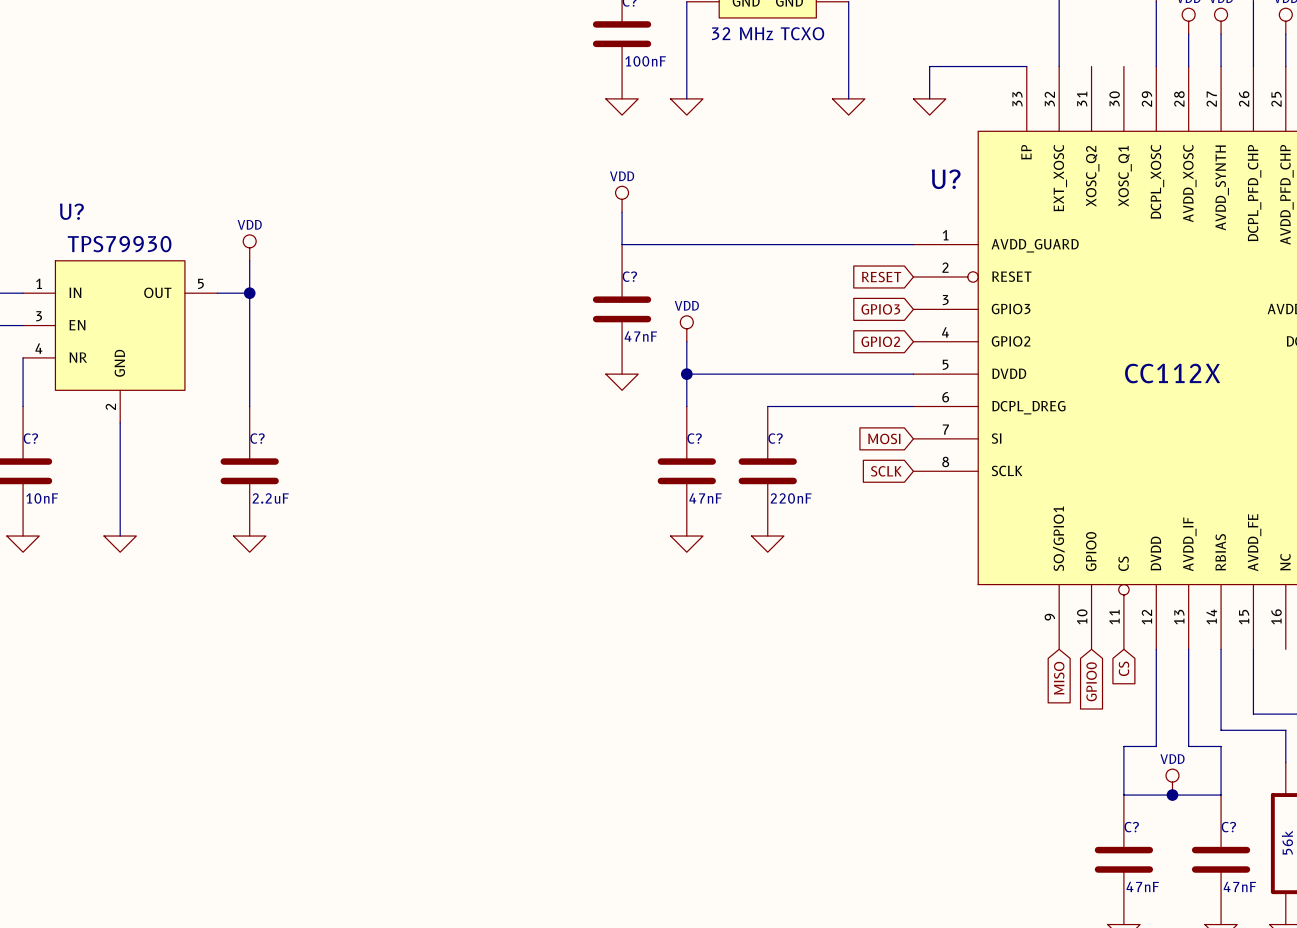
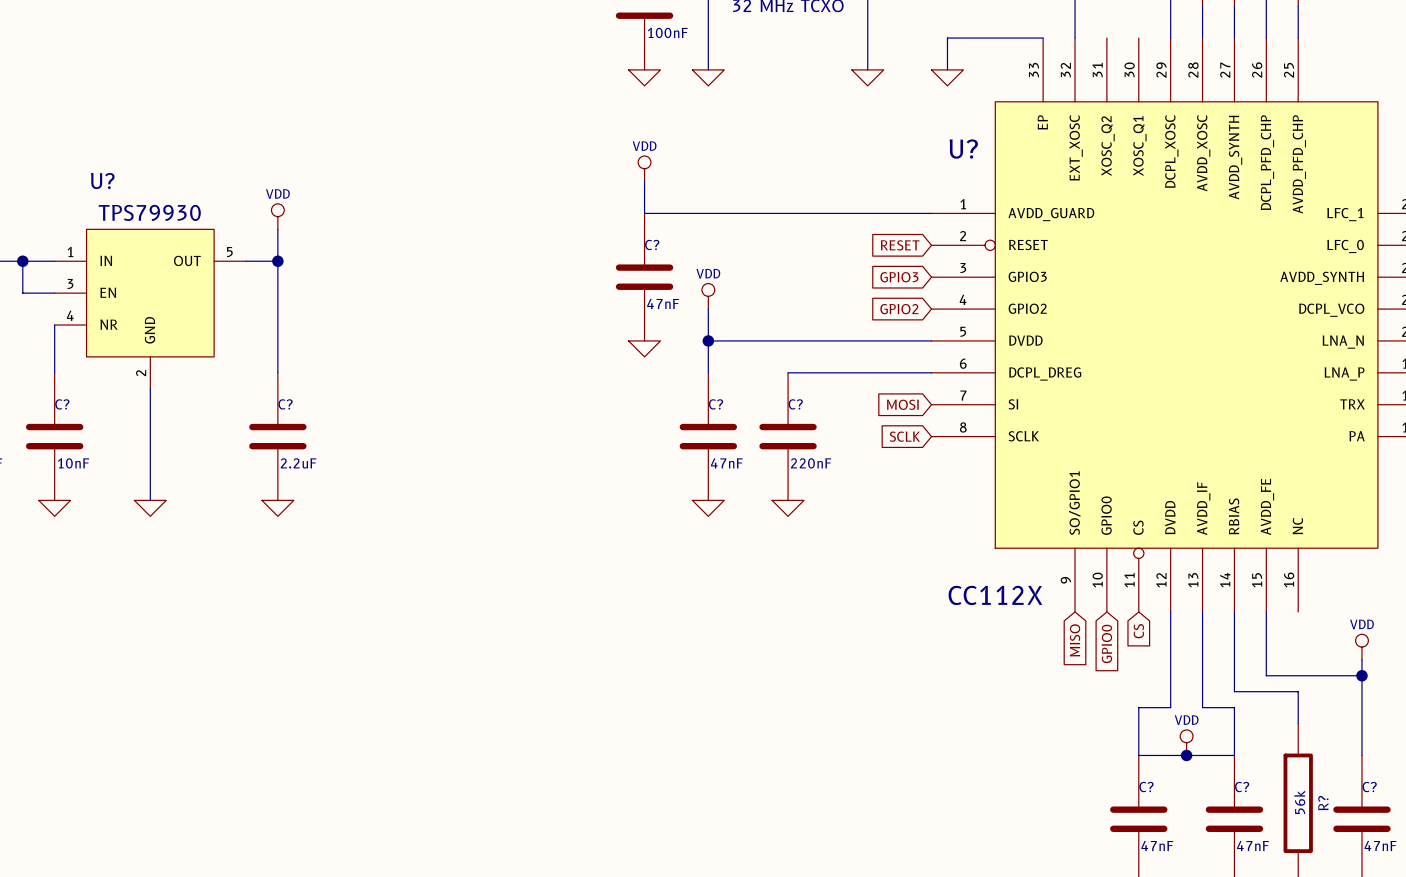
U? value position: CC112X (1172, 373) -> CC112X (995, 595)

